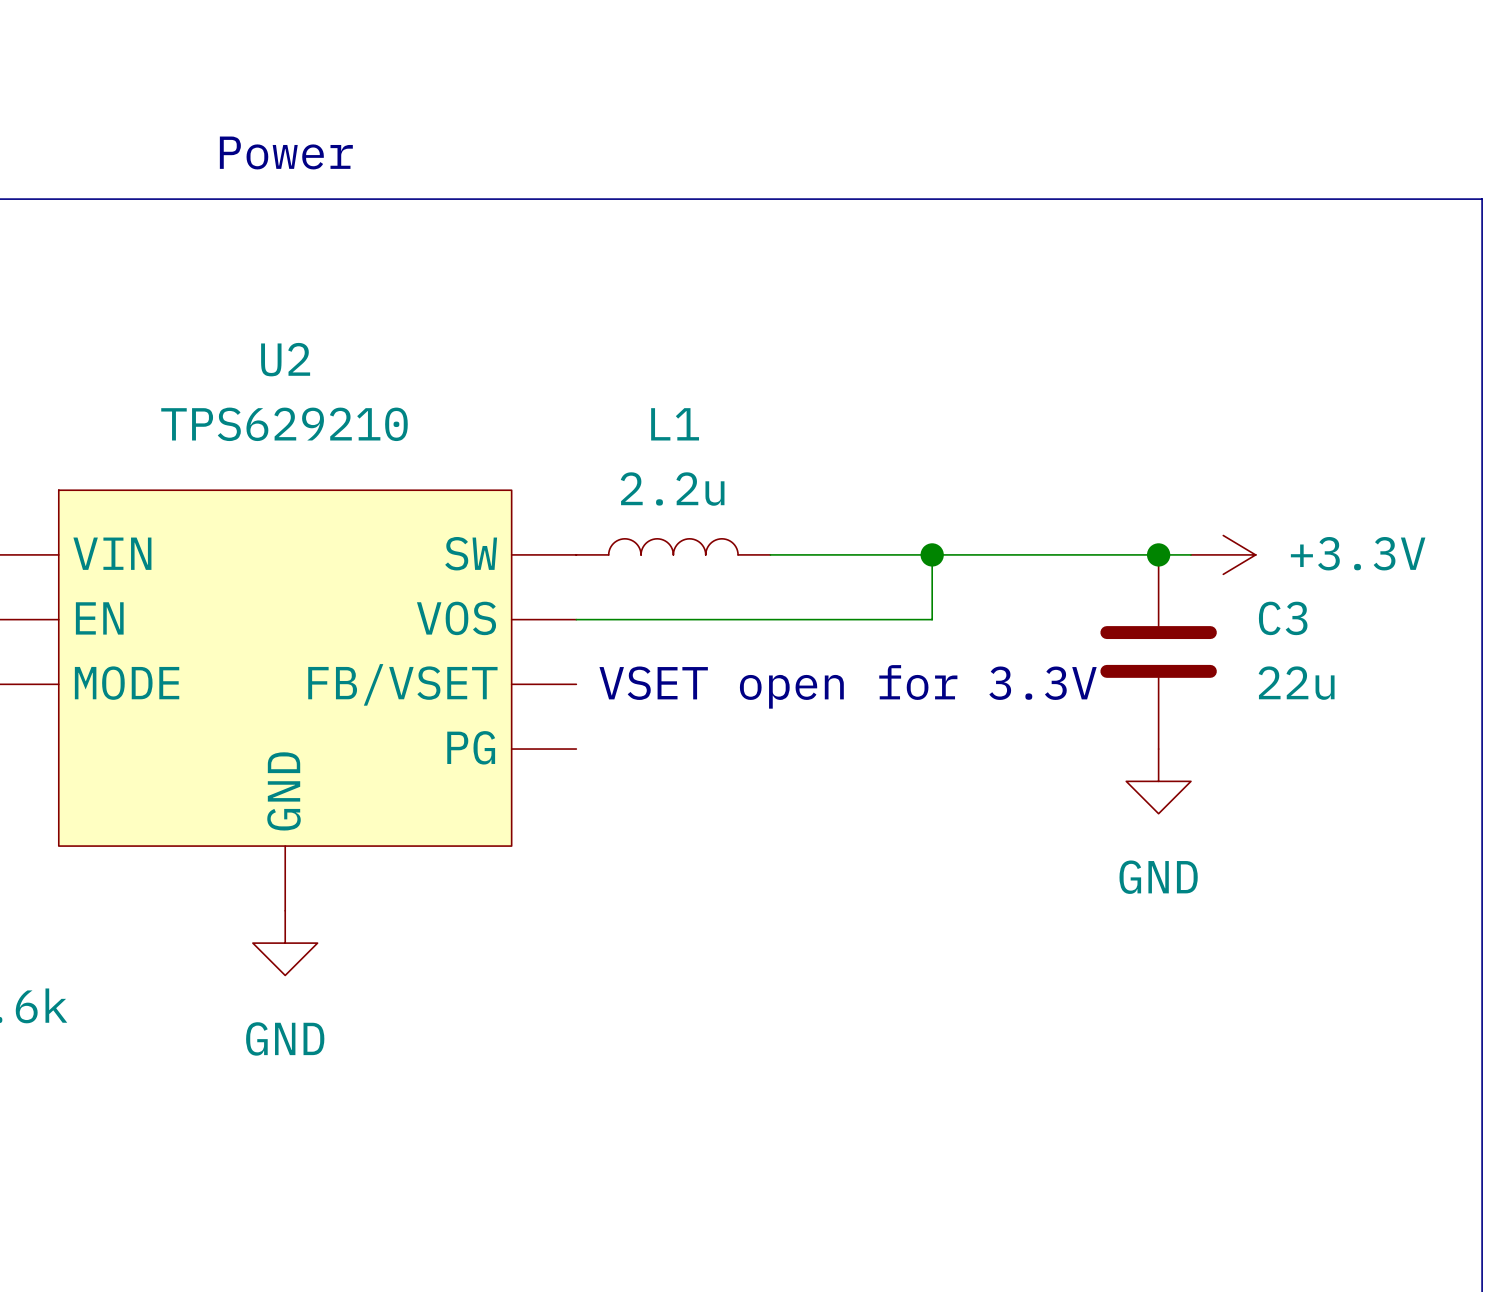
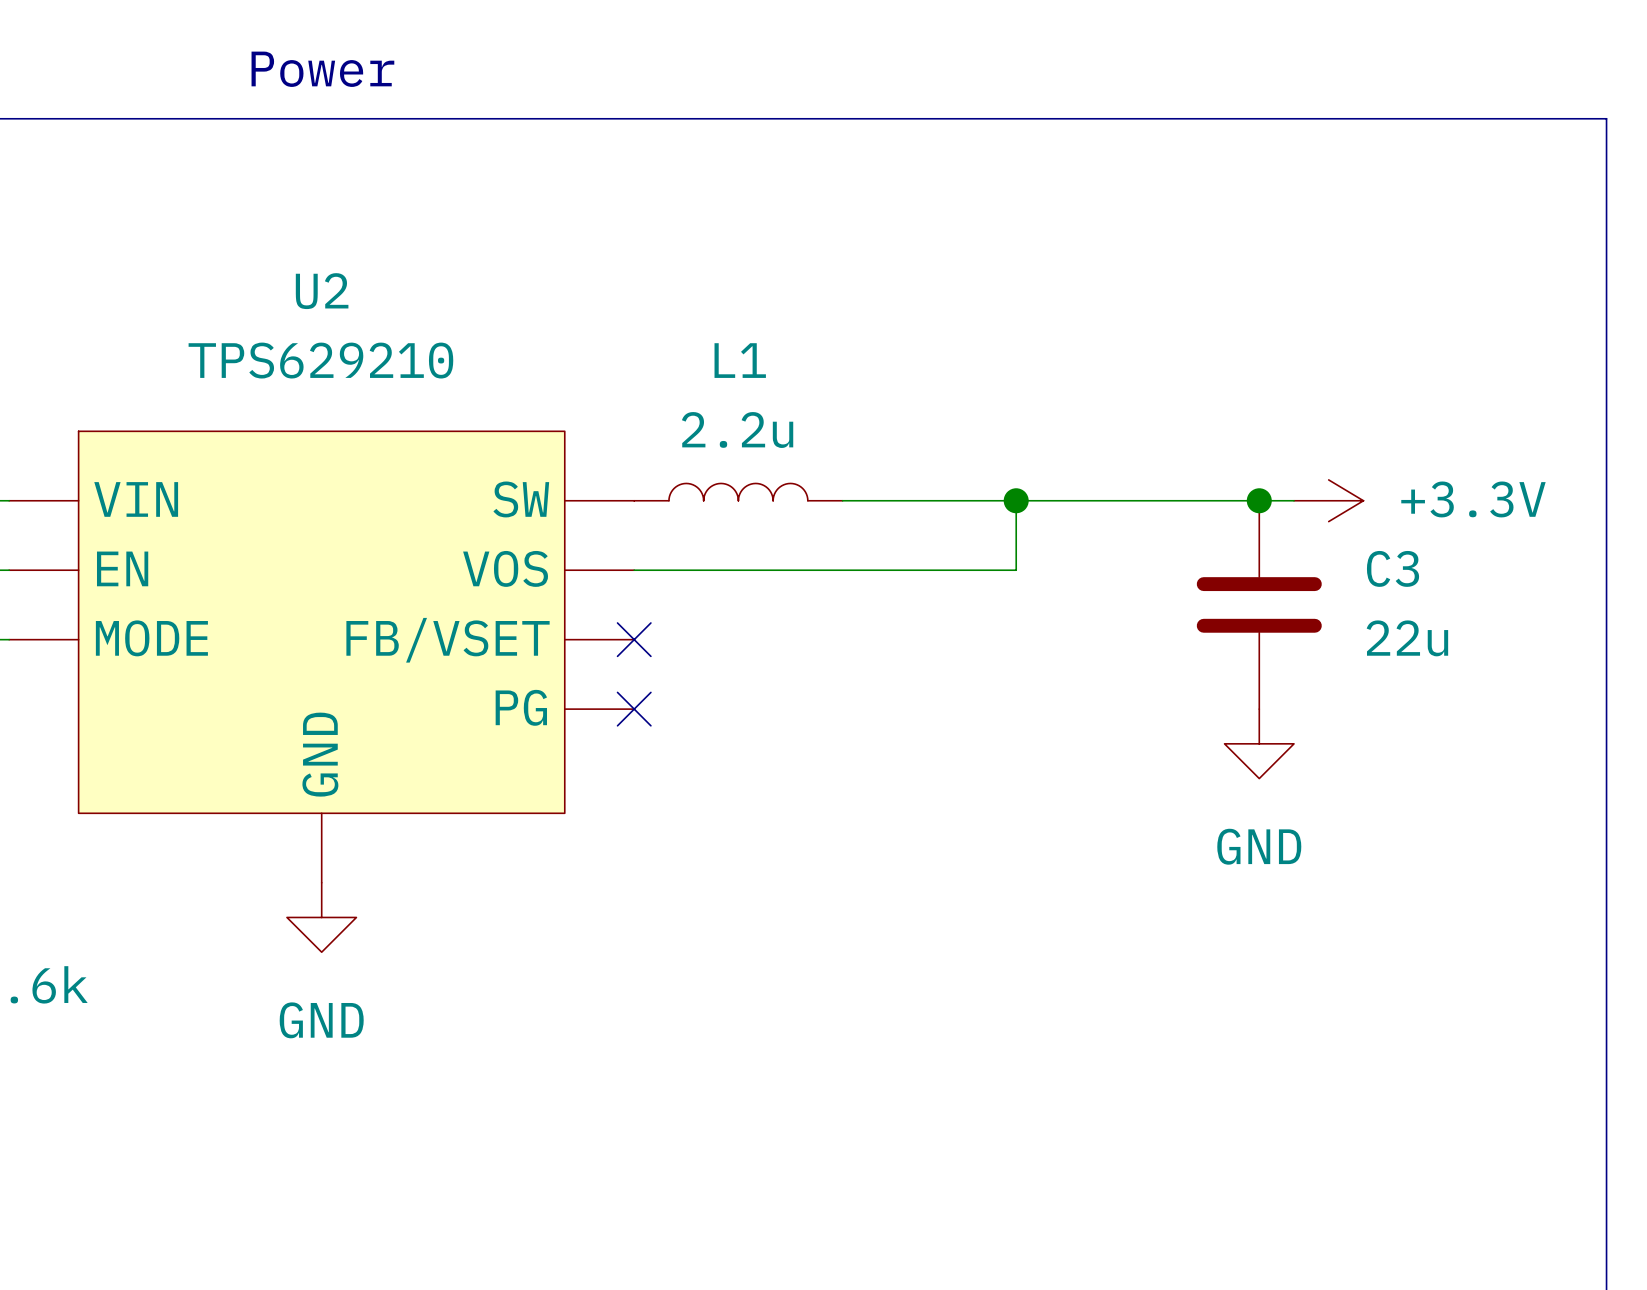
no-connect mark: none -> (634, 639)
text: VSET open for 3.3V (848, 686) -> none
no-connect mark: none -> (634, 709)

